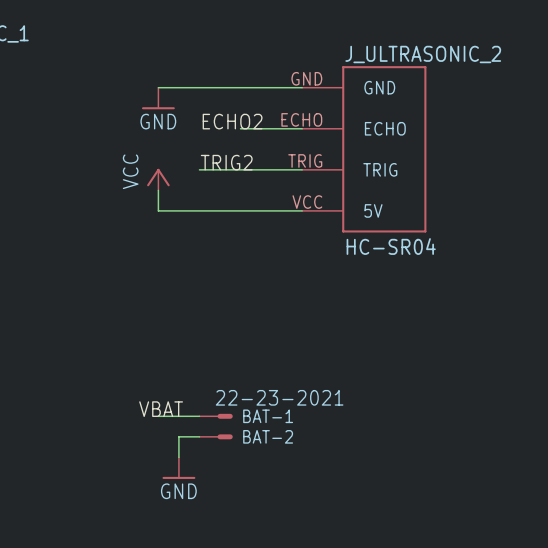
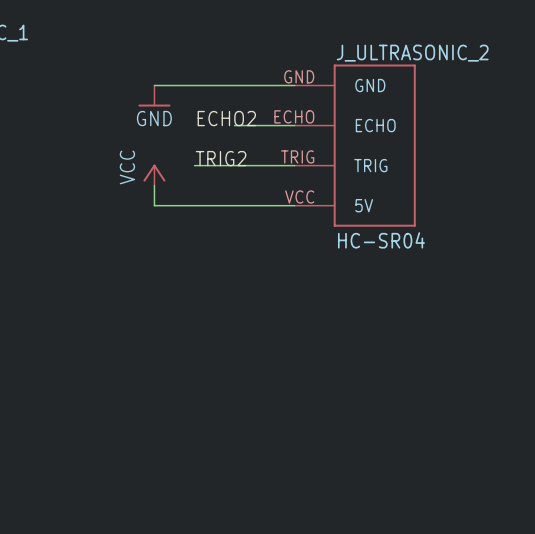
label: VBAT (161, 409) -> none
wire: (158, 416) (199, 416) -> none
BAT-1: 22-23-2021 (216, 416) -> none
wire: (199, 436) (178, 436) (178, 457) -> none
BAT-2: (216, 436) -> none
power symbol: GND (178, 468) -> none

